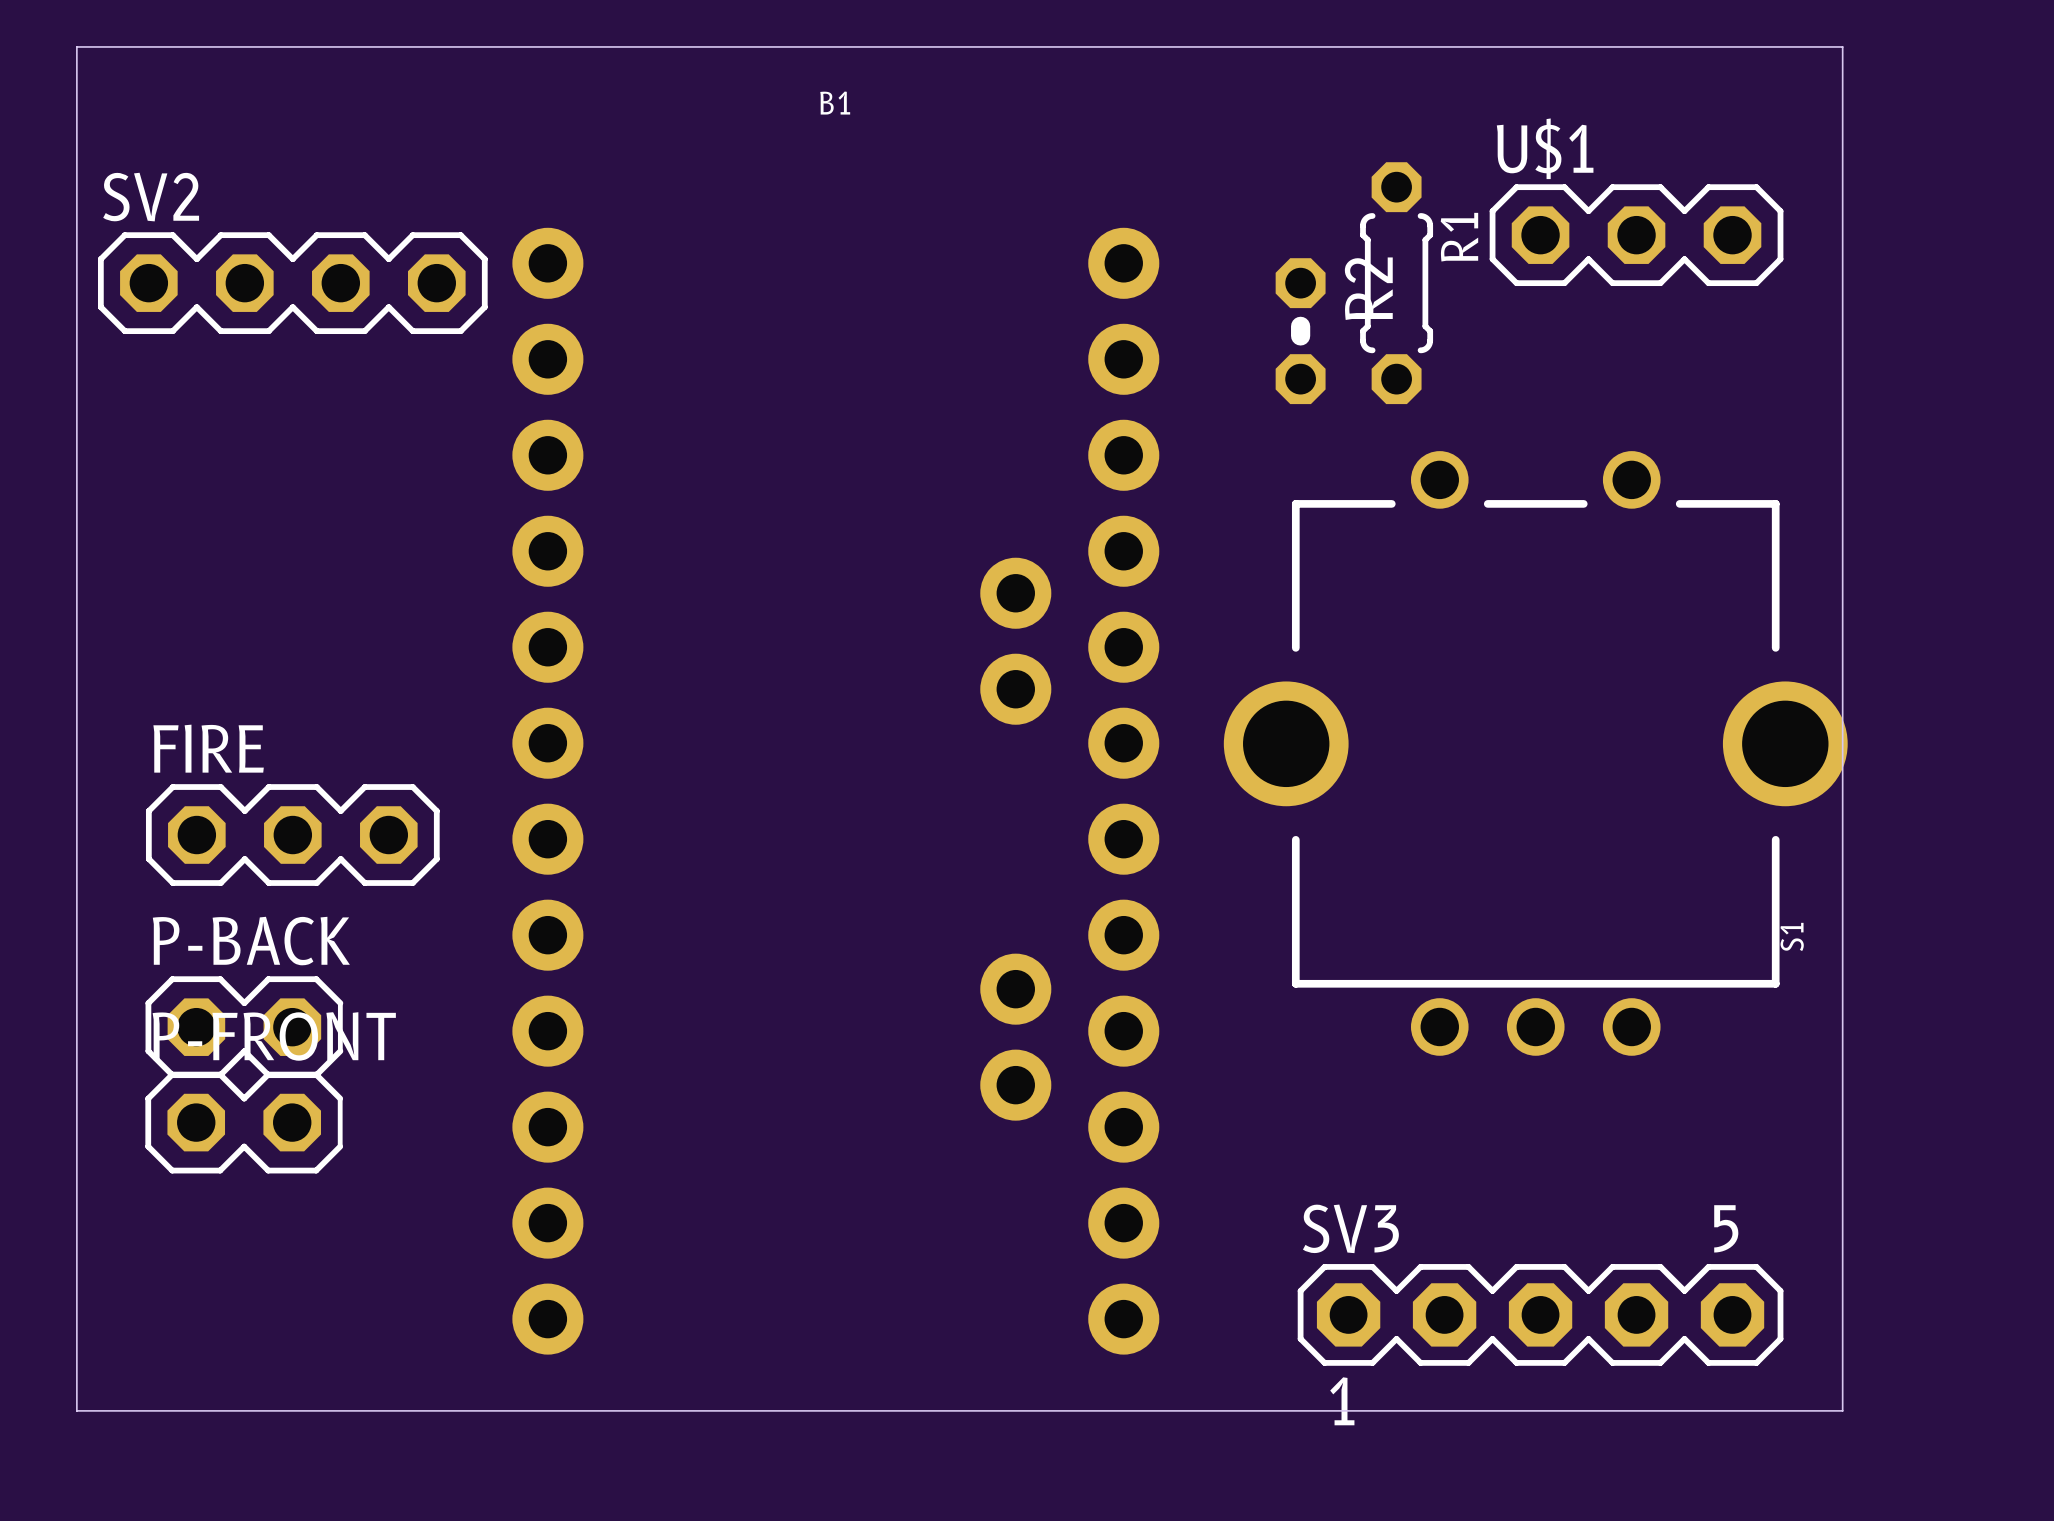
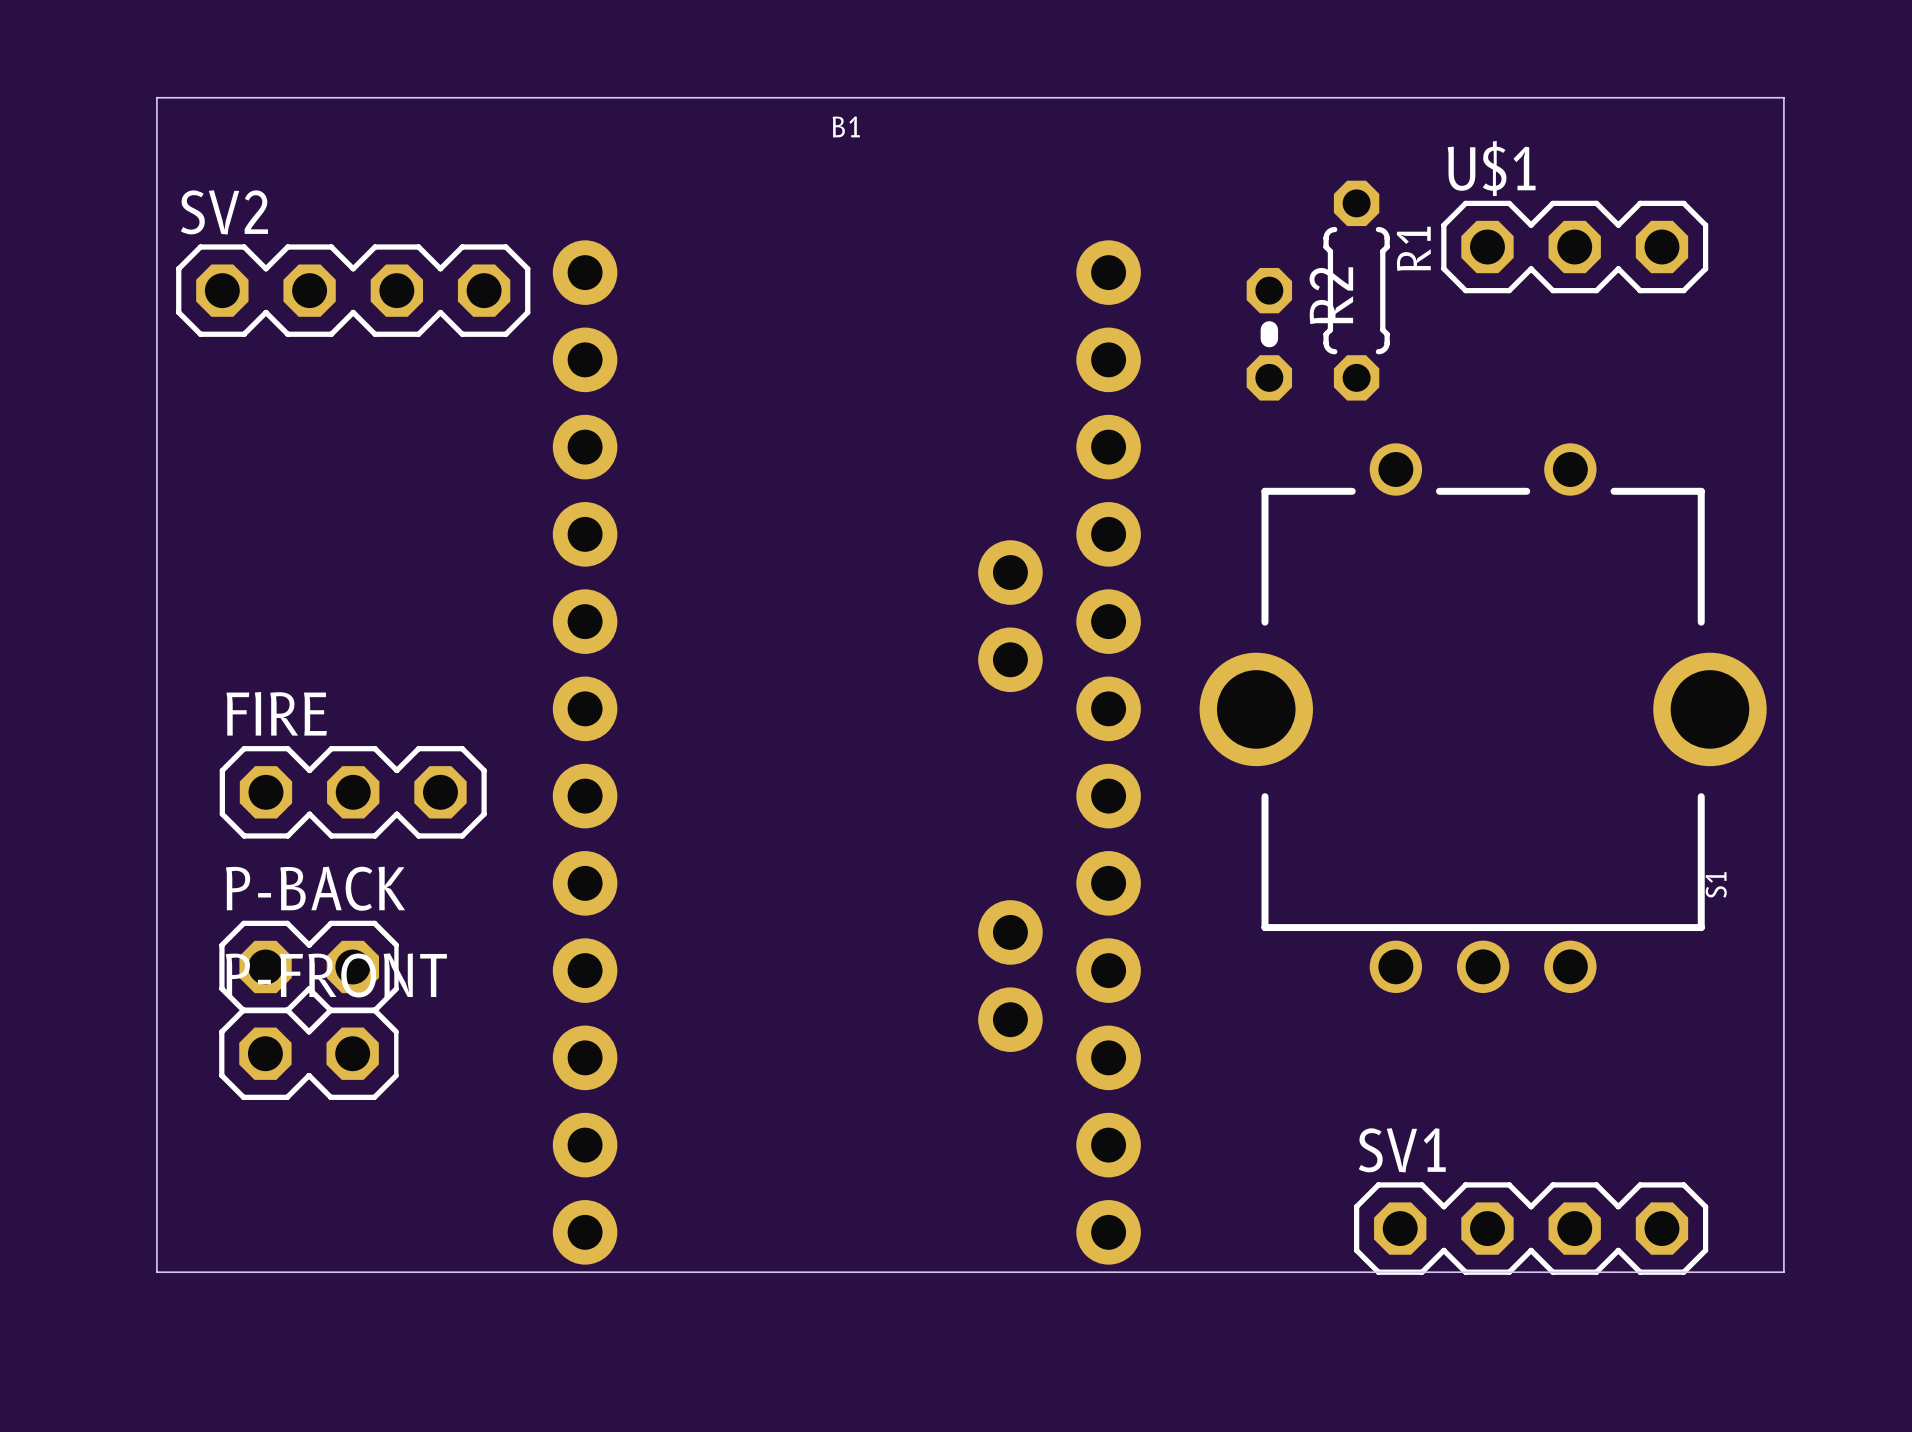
board edge: (76, 70) (76, 46) (1842, 46) (1842, 1410) (76, 1410) (76, 1362) -> (156, 97) (1783, 97) (1783, 1272) (156, 1272)
SV3: (1540, 1314) -> none
SV1: none -> (1531, 1228)

